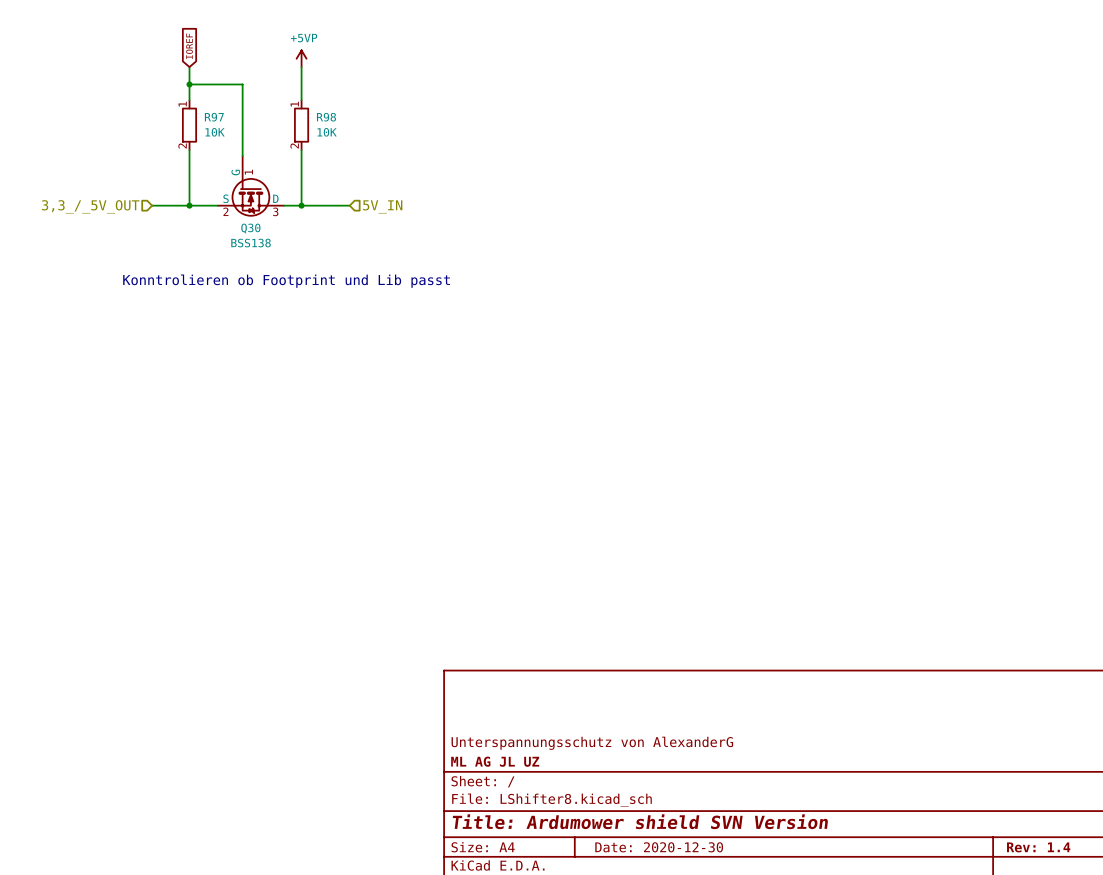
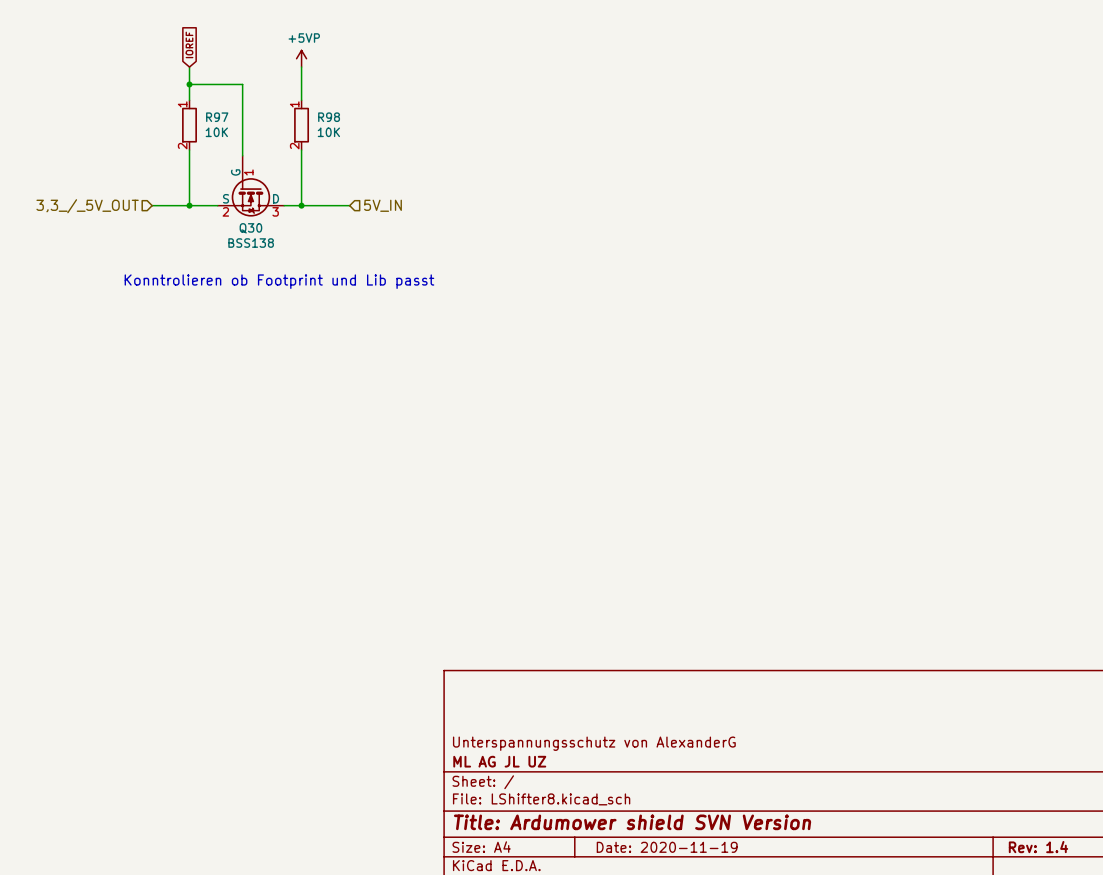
title block: Date: 2020-12-30 (659, 847) -> Date: 2020-11-19 (667, 847)

